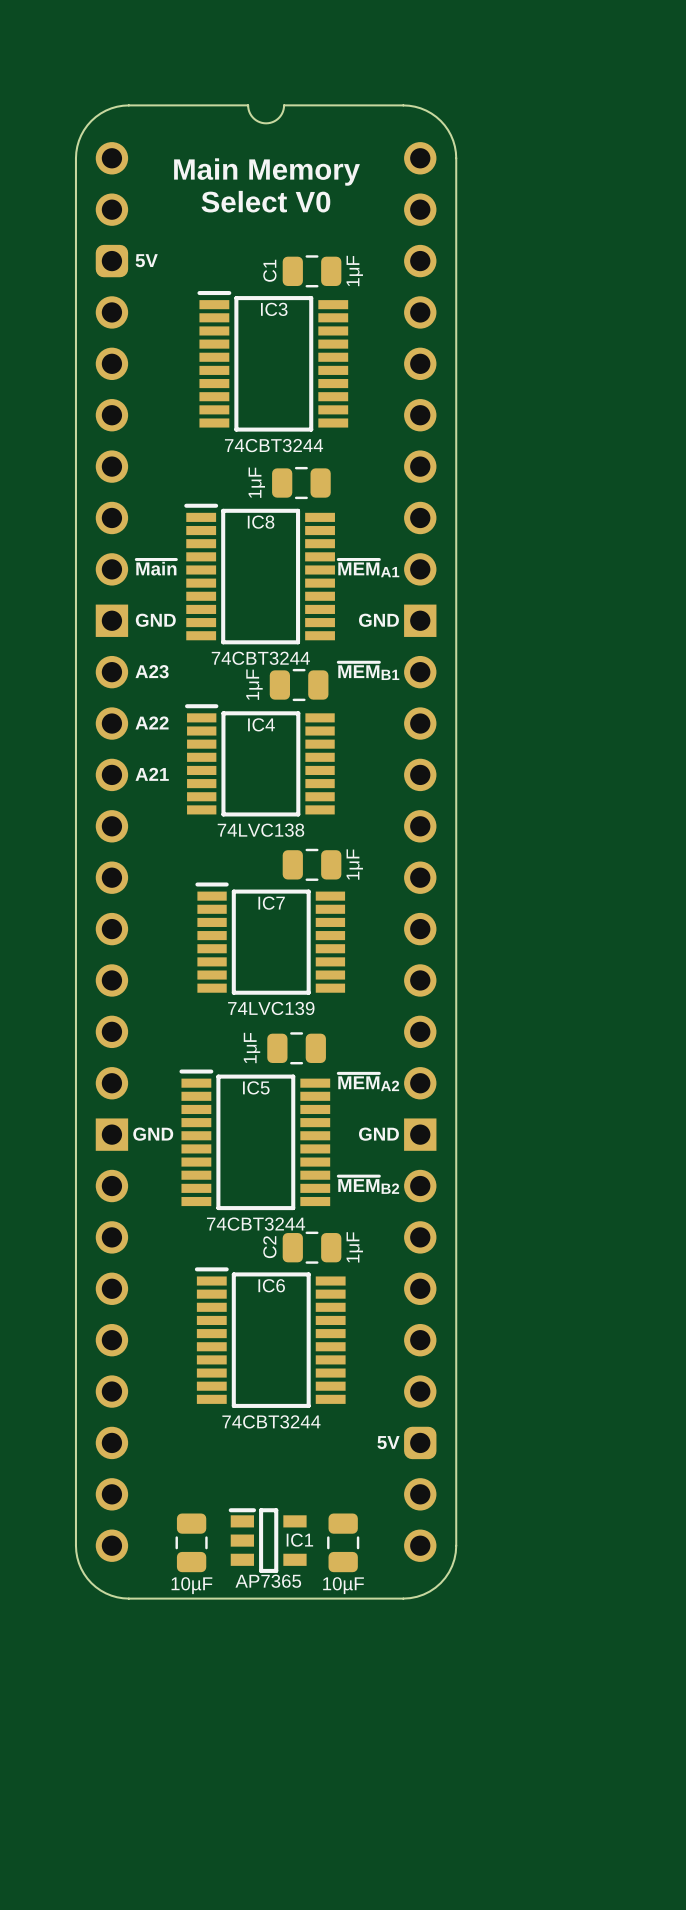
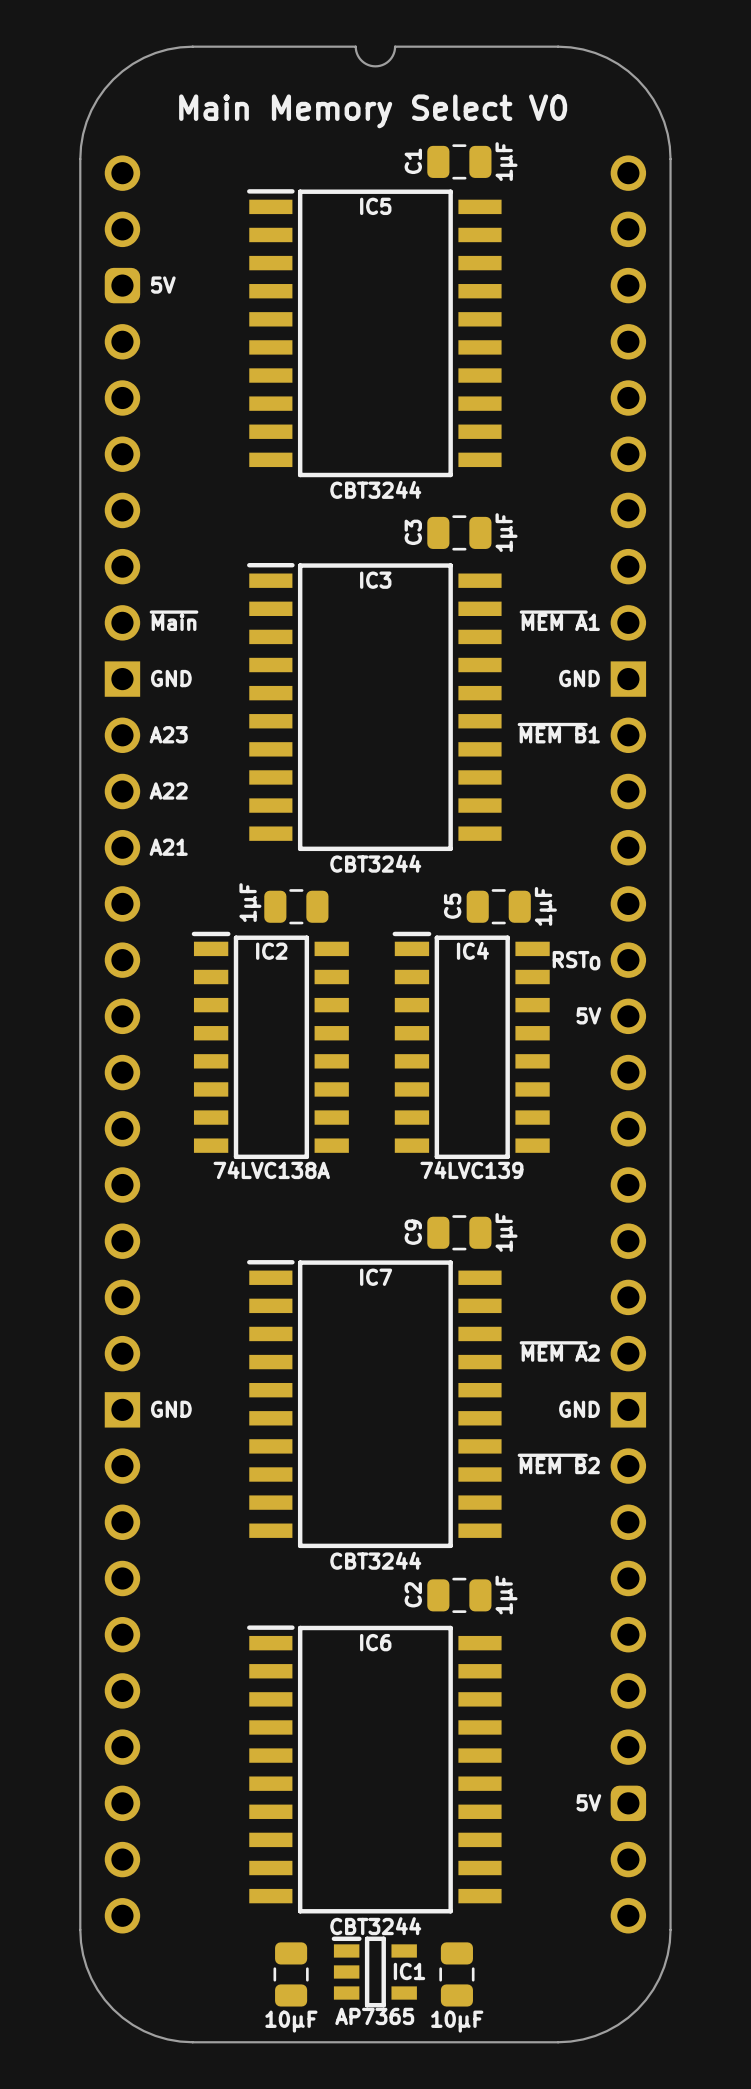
text: none -> Main Memory Select V0 (373, 111)
text: Main Memory (267, 172) -> none
text: Select V0 (265, 201) -> none
C1 position: (312, 271) -> (459, 161)
IC3 footprint: [197, 291, 349, 432] -> [247, 563, 502, 852]
IC3 name position: IC3 (274, 309) -> IC3 (375, 580)
part: 1μF (301, 483) -> none
C3: none -> 1μF (459, 532)
text: none -> ~{MEM A}1 (559, 620)
text: ~{MEM}A1 (368, 568) -> none
IC8: (259, 574) -> none
text position: GND (378, 620) -> GND (579, 678)
text: none -> ~{MEM B}1 (558, 733)
text: ~{MEM}B1 (368, 671) -> none
part: 1μF (299, 685) -> none
IC4 footprint: [185, 704, 335, 817] -> [392, 931, 550, 1160]
IC4 name position: IC4 (261, 724) -> IC4 (472, 950)
C5: none -> 1μF (498, 906)
part: (266, 851) -> none
part position: (312, 864) -> (296, 906)
part value position: 1μF (354, 864) -> 1μF (250, 902)
text: none -> RSTO (576, 960)
IC7 footprint: [195, 882, 346, 995] -> [247, 1260, 502, 1549]
IC7 name position: IC7 (271, 903) -> IC7 (376, 1277)
text: none -> 5V (588, 1015)
part: none -> (375, 1044)
IC2: none -> (270, 1045)
part: 1μF (296, 1048) -> none
IC5 footprint: [179, 1069, 331, 1211] -> [247, 189, 502, 478]
text: ~{MEM}A2 (368, 1082) -> none
IC5 name position: IC5 (256, 1087) -> IC5 (375, 206)
C9: none -> 1μF (459, 1232)
text: GND (153, 1134) -> none
text: GND (378, 1134) -> none
text: ~{MEM}B2 (368, 1185) -> none
text: none -> ~{MEM A}2 (559, 1351)
C2 position: (312, 1247) -> (459, 1595)
IC6 footprint: [194, 1267, 346, 1408] -> [247, 1625, 502, 1914]
IC6 name position: IC6 (271, 1285) -> IC6 (375, 1642)
text: none -> GND (171, 1409)
text: none -> GND (579, 1409)
text: none -> ~{MEM B}2 (558, 1463)
text position: 5V (388, 1442) -> 5V (588, 1802)
IC1 position: (267, 1540) -> (374, 1971)
part: 10µF (191, 1542) -> none
part: 10µF (343, 1542) -> none
part: none -> 10µF (291, 1974)
part: none -> 10µF (456, 1974)

